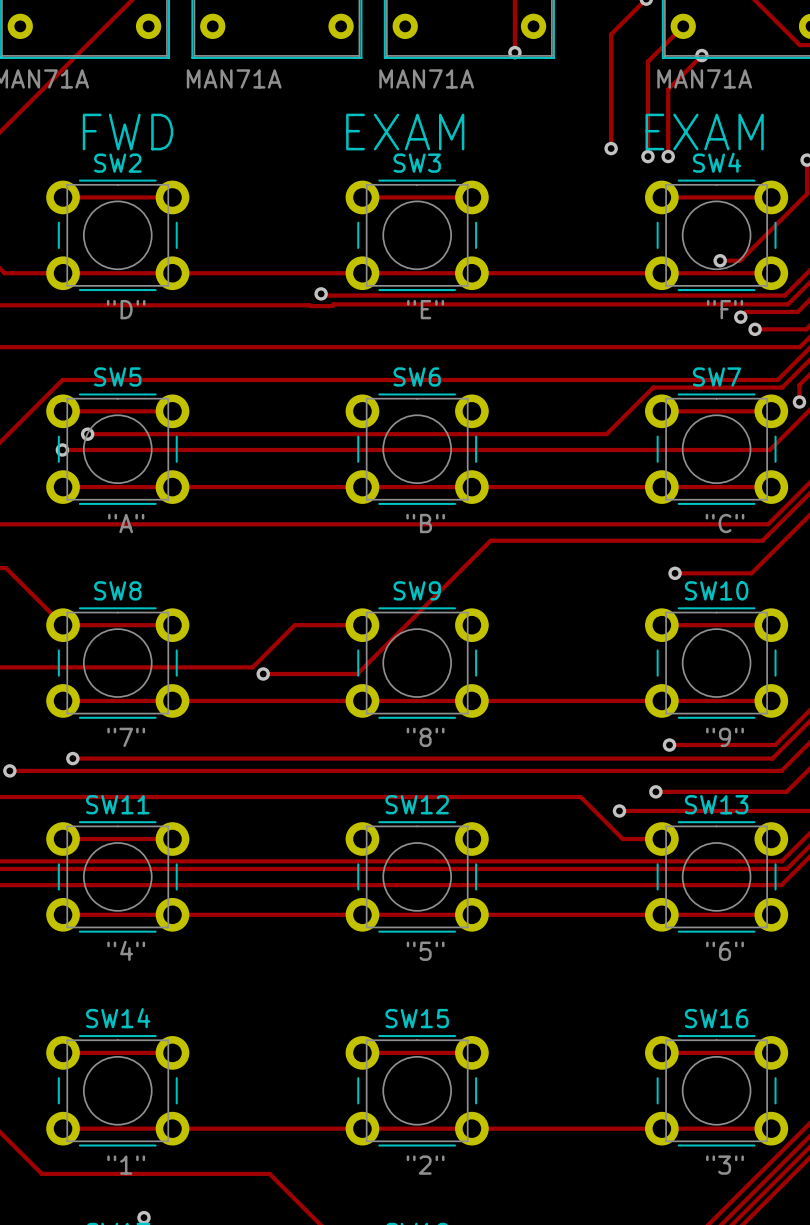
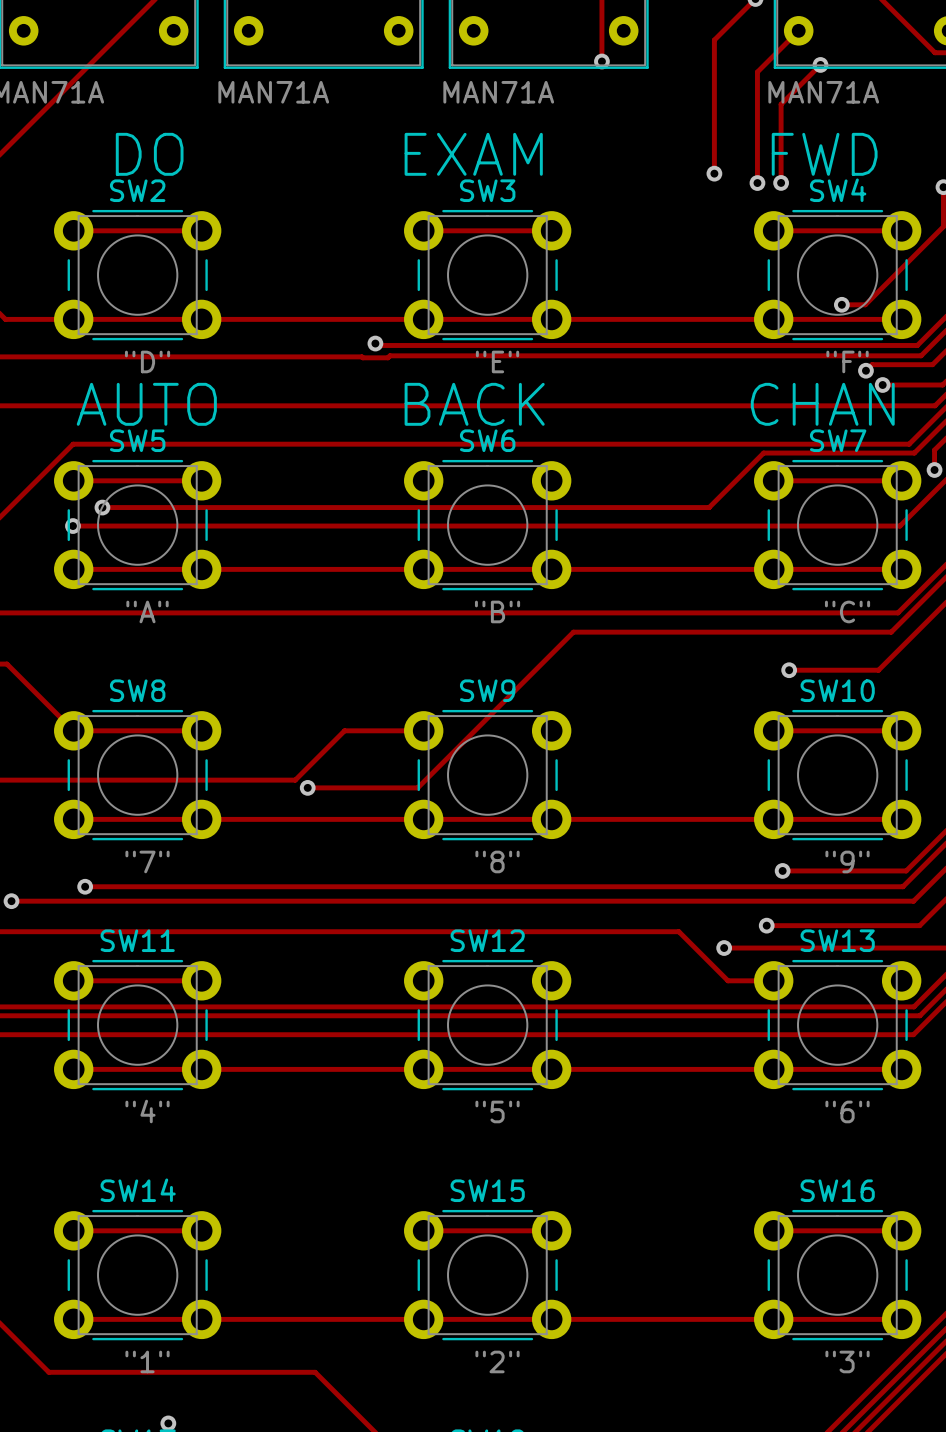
text: FWD (128, 132) -> DO (149, 154)
text: EXAM (704, 132) -> FWD (824, 154)
text: none -> AUTO (146, 404)
text: none -> BACK (474, 404)
text: none -> CHAN (822, 404)

